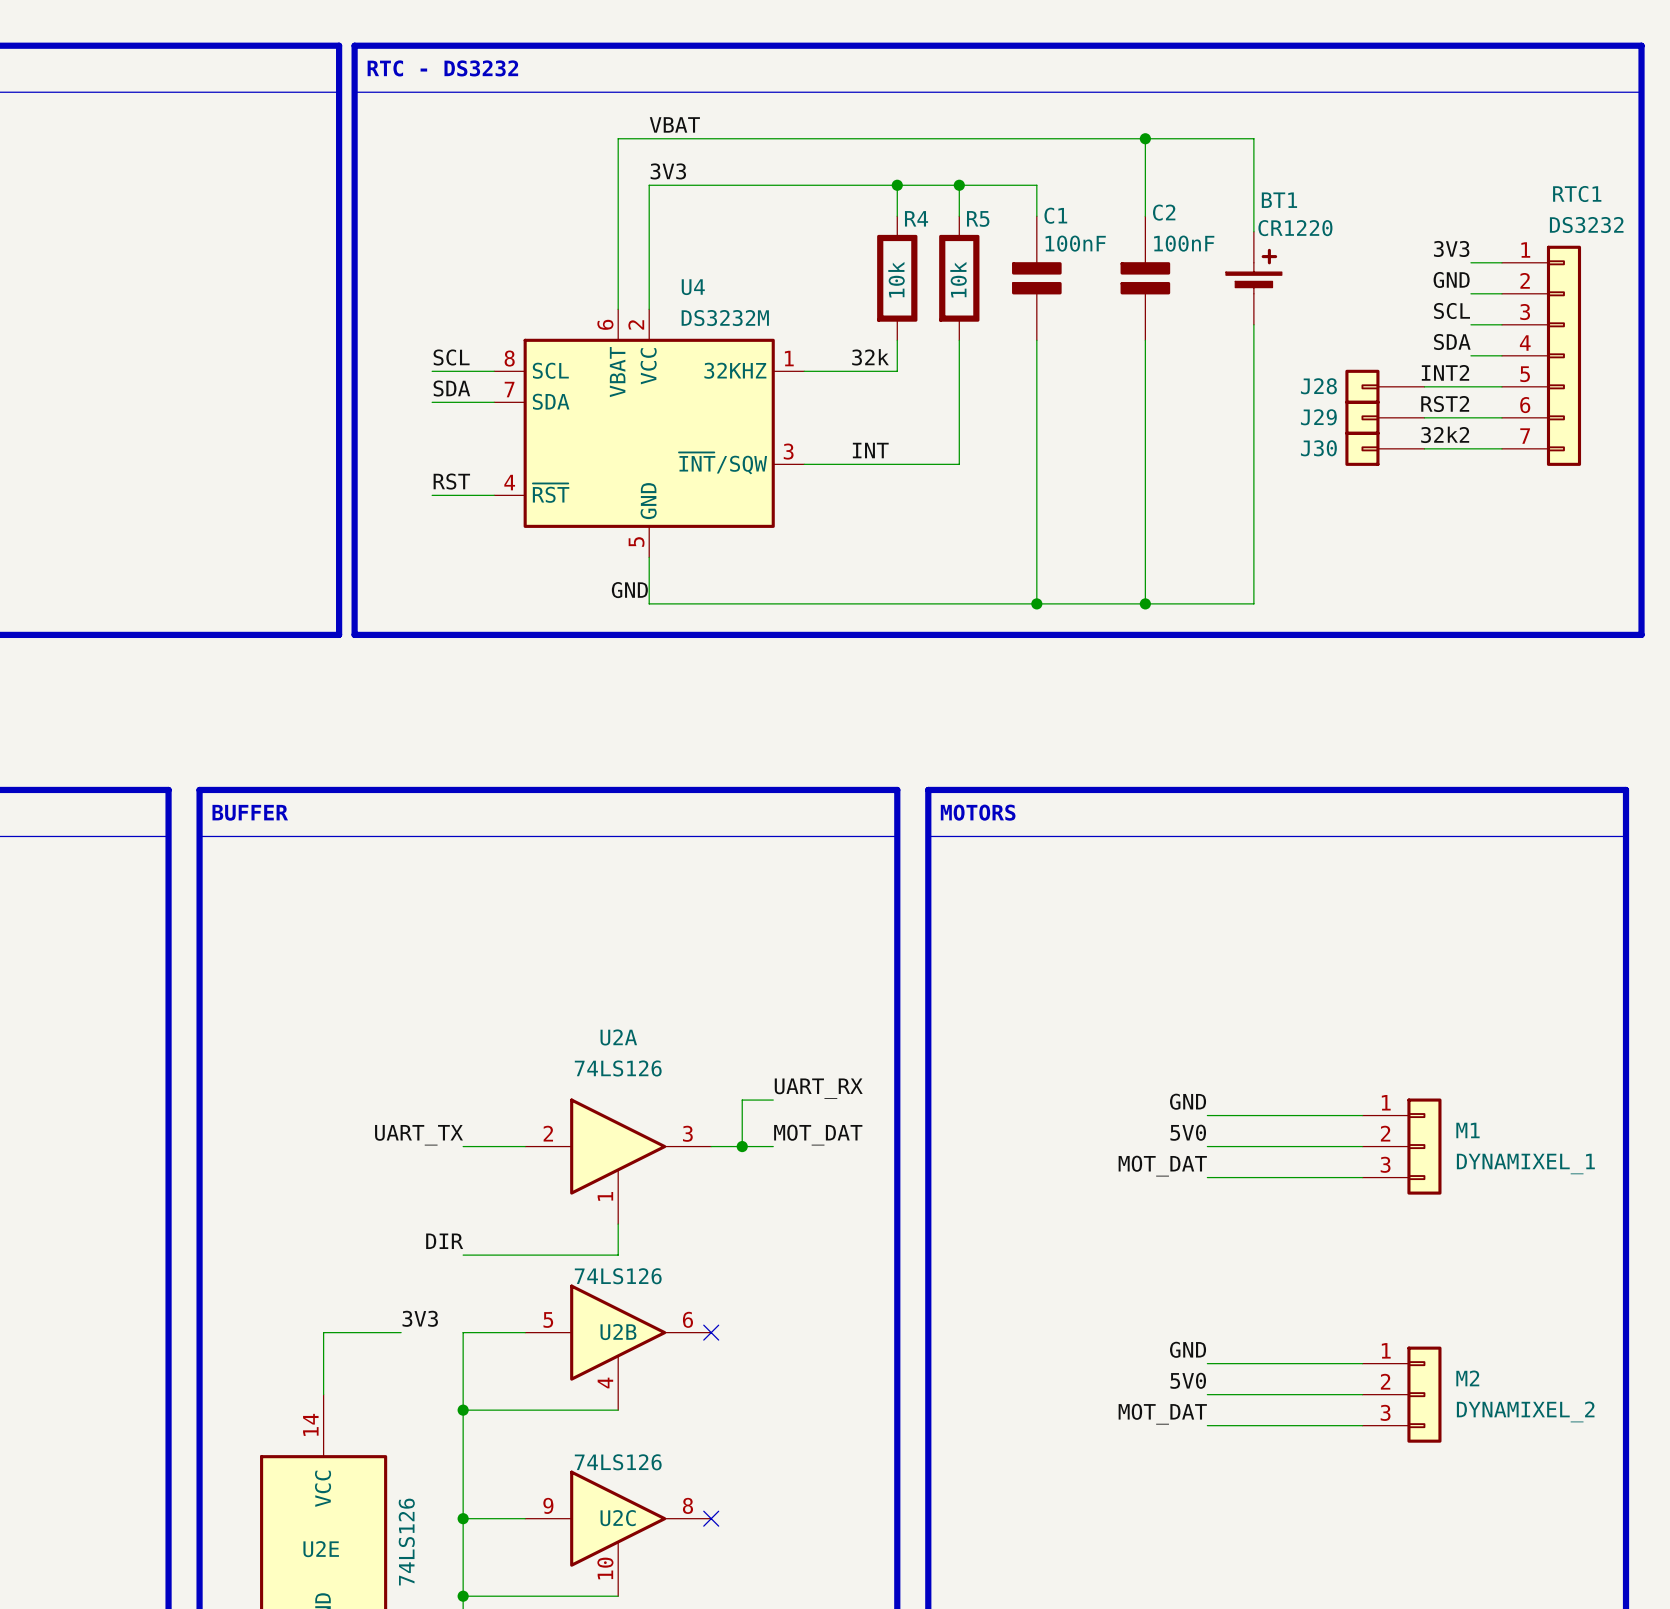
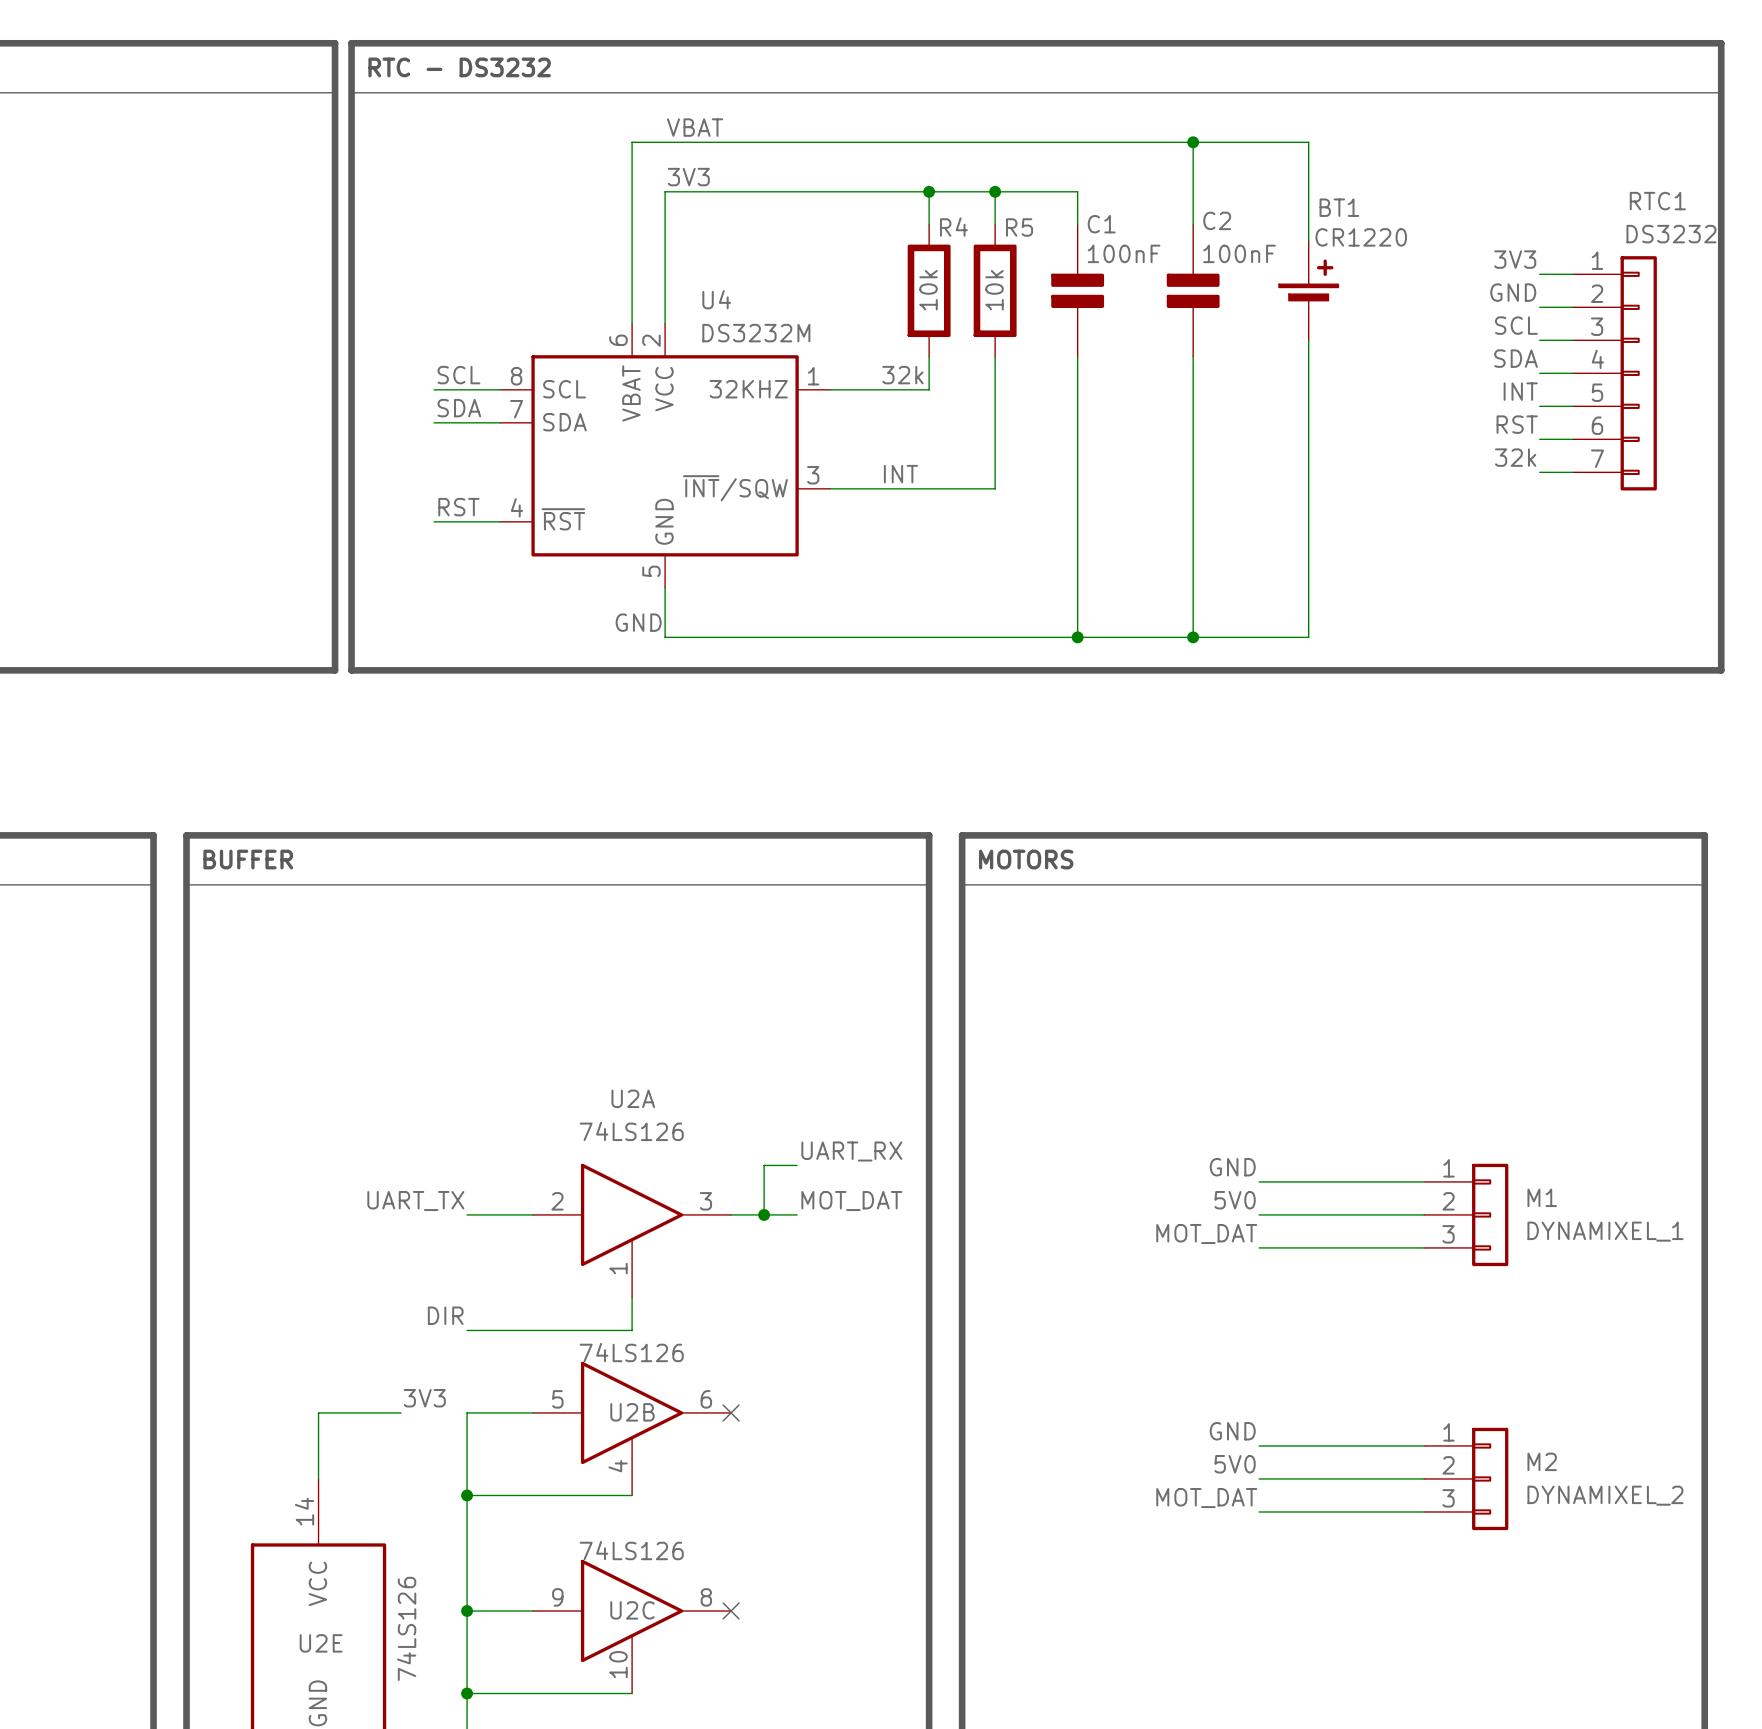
label: INT2 (1445, 372) -> INT (1520, 391)
J28: (1384, 386) -> none
wire: (1424, 386) (1470, 386) -> none
label: RST2 (1445, 404) -> RST (1517, 424)
J29: (1384, 417) -> none
wire: (1424, 417) (1470, 417) -> none
label: 32k2 (1445, 434) -> 32k (1515, 457)
J30: (1384, 448) -> none
wire: (1424, 448) (1470, 448) -> none

